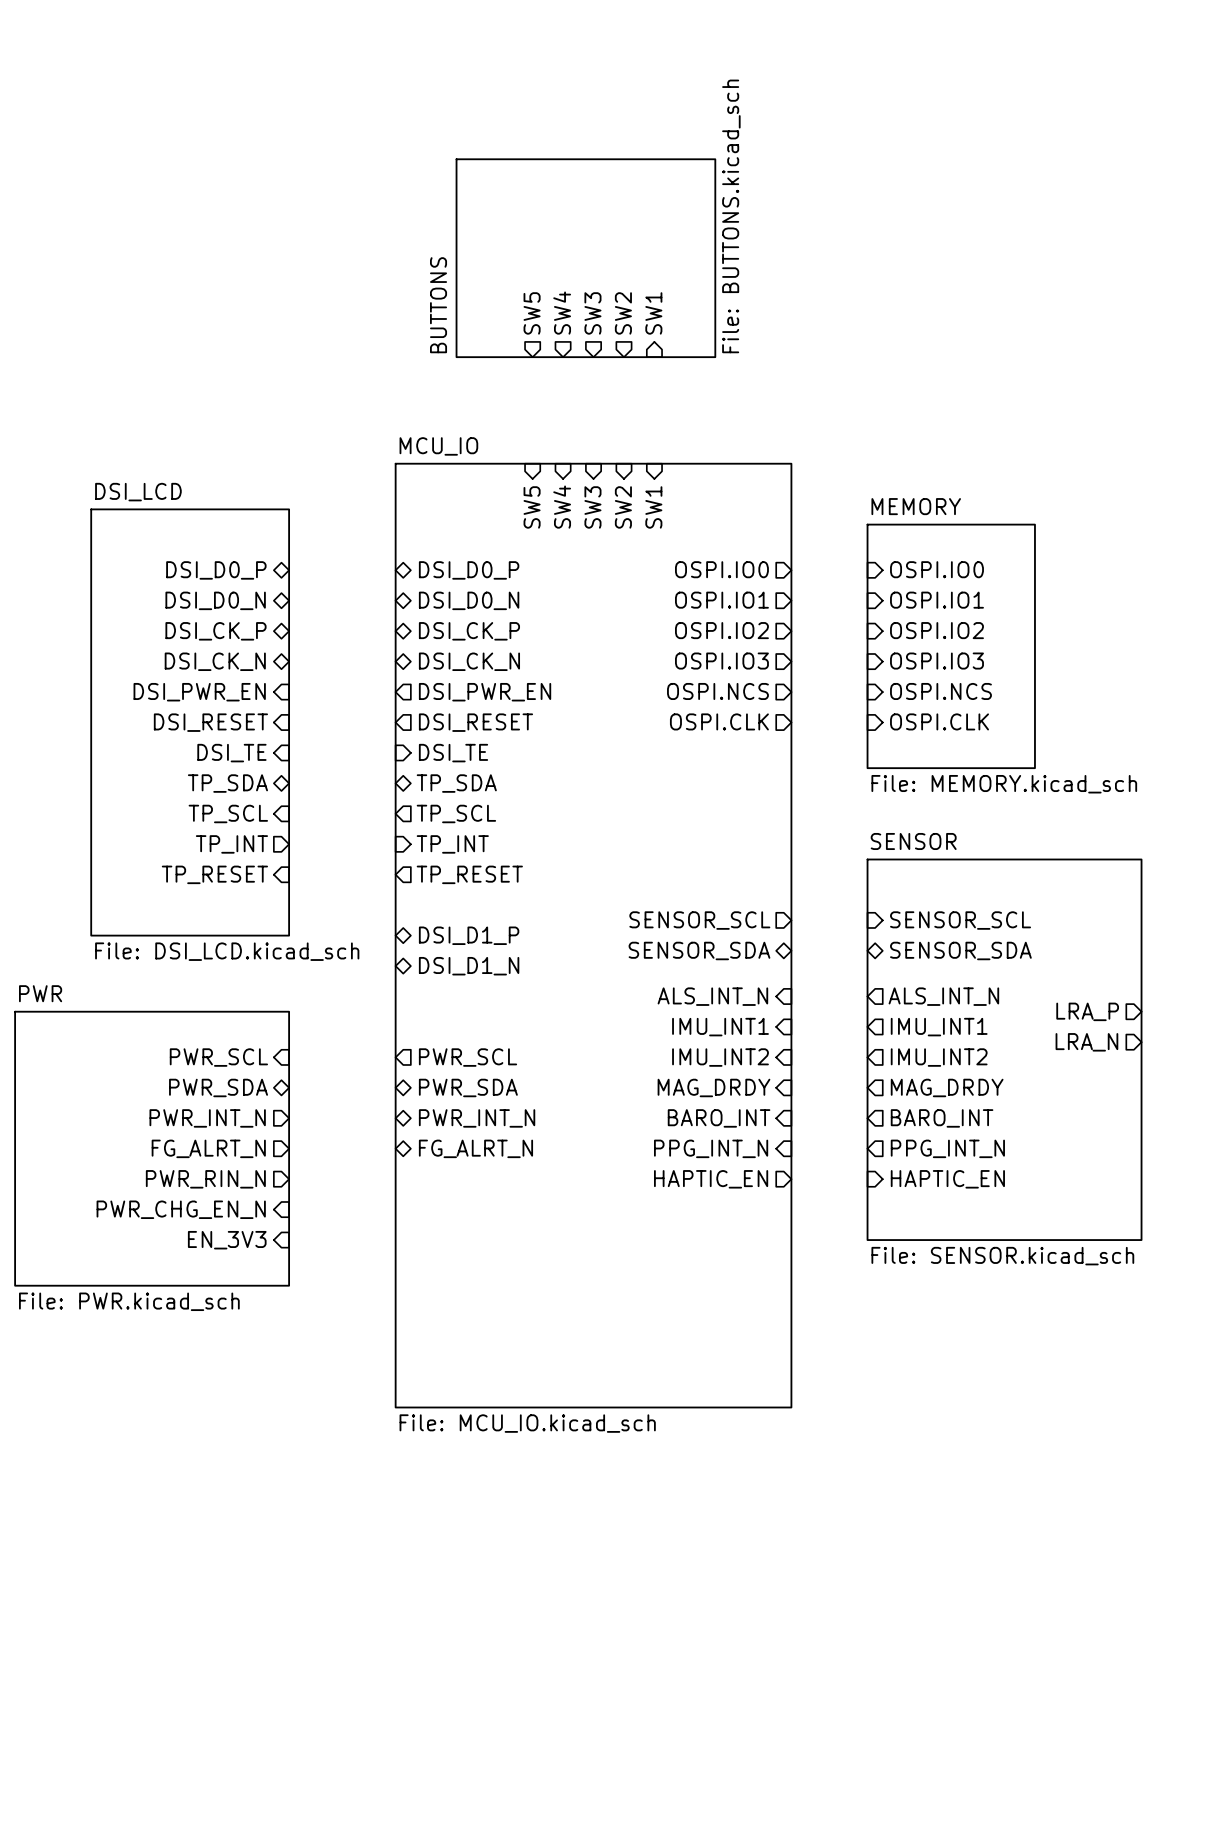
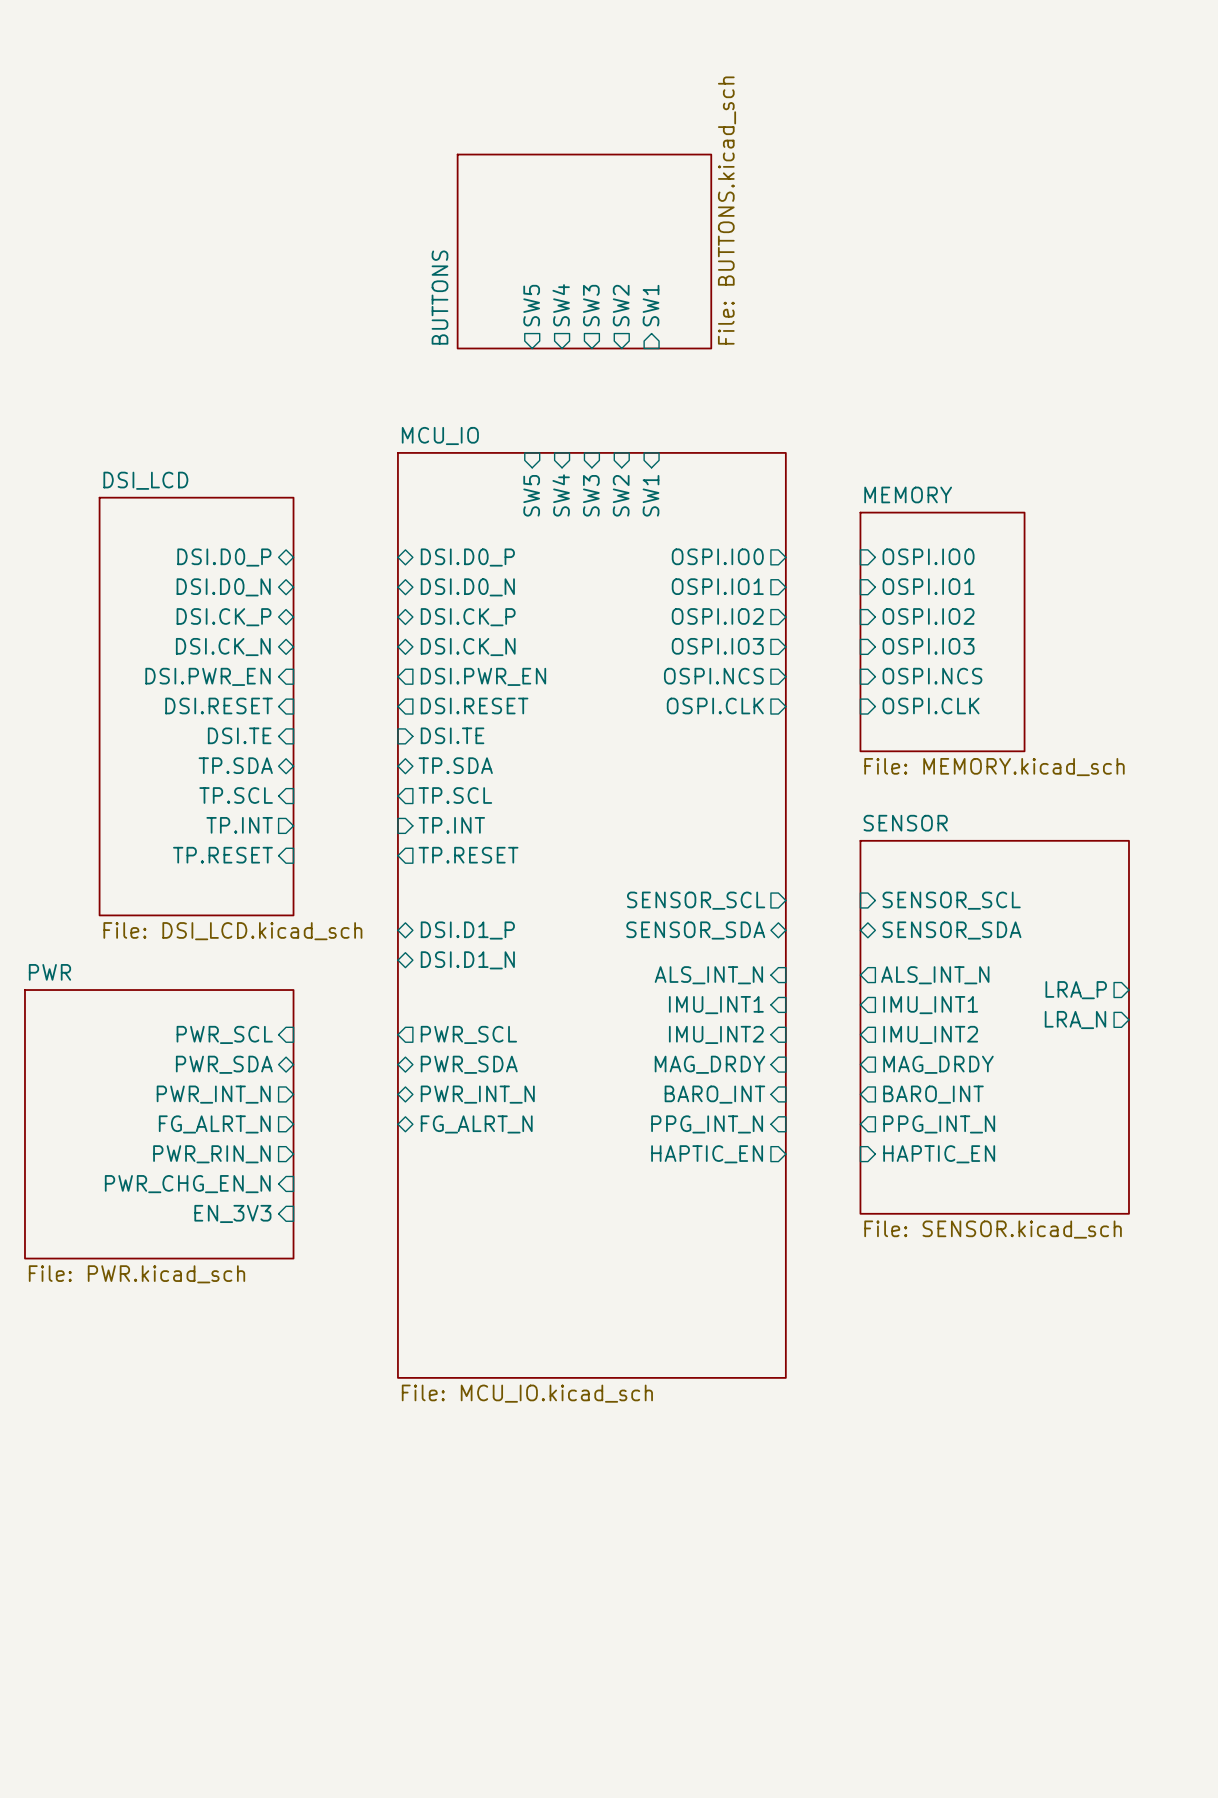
sheet pin: DSI_D0_P (216, 570) -> DSI.D0_P (224, 557)
sheet pin: DSI_D0_P (469, 570) -> DSI.D0_P (467, 557)
sheet pin: DSI_D0_N (215, 600) -> DSI.D0_N (223, 587)
sheet pin: DSI_D0_N (469, 600) -> DSI.D0_N (467, 587)
sheet pin: DSI_CK_P (216, 631) -> DSI.CK_P (224, 617)
sheet pin: DSI_CK_P (469, 631) -> DSI.CK_P (468, 617)
sheet pin: DSI_CK_N (215, 661) -> DSI.CK_N (223, 647)
sheet pin: DSI_CK_N (469, 661) -> DSI.CK_N (468, 647)
sheet pin: DSI_PWR_EN (199, 692) -> DSI.PWR_EN (208, 676)
sheet pin: DSI_PWR_EN (485, 692) -> DSI.PWR_EN (483, 676)
sheet pin: DSI_RESET (210, 722) -> DSI.RESET (219, 705)
sheet pin: DSI_RESET (475, 722) -> DSI.RESET (474, 705)
sheet pin: DSI_TE (231, 753) -> DSI.TE (239, 735)
sheet pin: DSI_TE (453, 753) -> DSI.TE (452, 735)
sheet pin: TP_SDA (227, 783) -> TP.SDA (235, 765)
sheet pin: TP_SDA (456, 783) -> TP.SDA (455, 765)
sheet pin: TP_SCL (228, 813) -> TP.SCL (236, 795)
sheet pin: TP_SCL (456, 813) -> TP.SCL (455, 795)
sheet pin: TP_INT (231, 844) -> TP.INT (239, 825)
sheet pin: TP_INT (452, 844) -> TP.INT (451, 825)
sheet pin: TP_RESET (214, 874) -> TP.RESET (222, 855)
sheet pin: TP_RESET (469, 874) -> TP.RESET (468, 855)
sheet pin: DSI_D1_P (469, 935) -> none
sheet pin: none -> DSI.D1_P (467, 930)
sheet pin: DSI_D1_N (469, 966) -> none
sheet pin: none -> DSI.D1_N (467, 960)

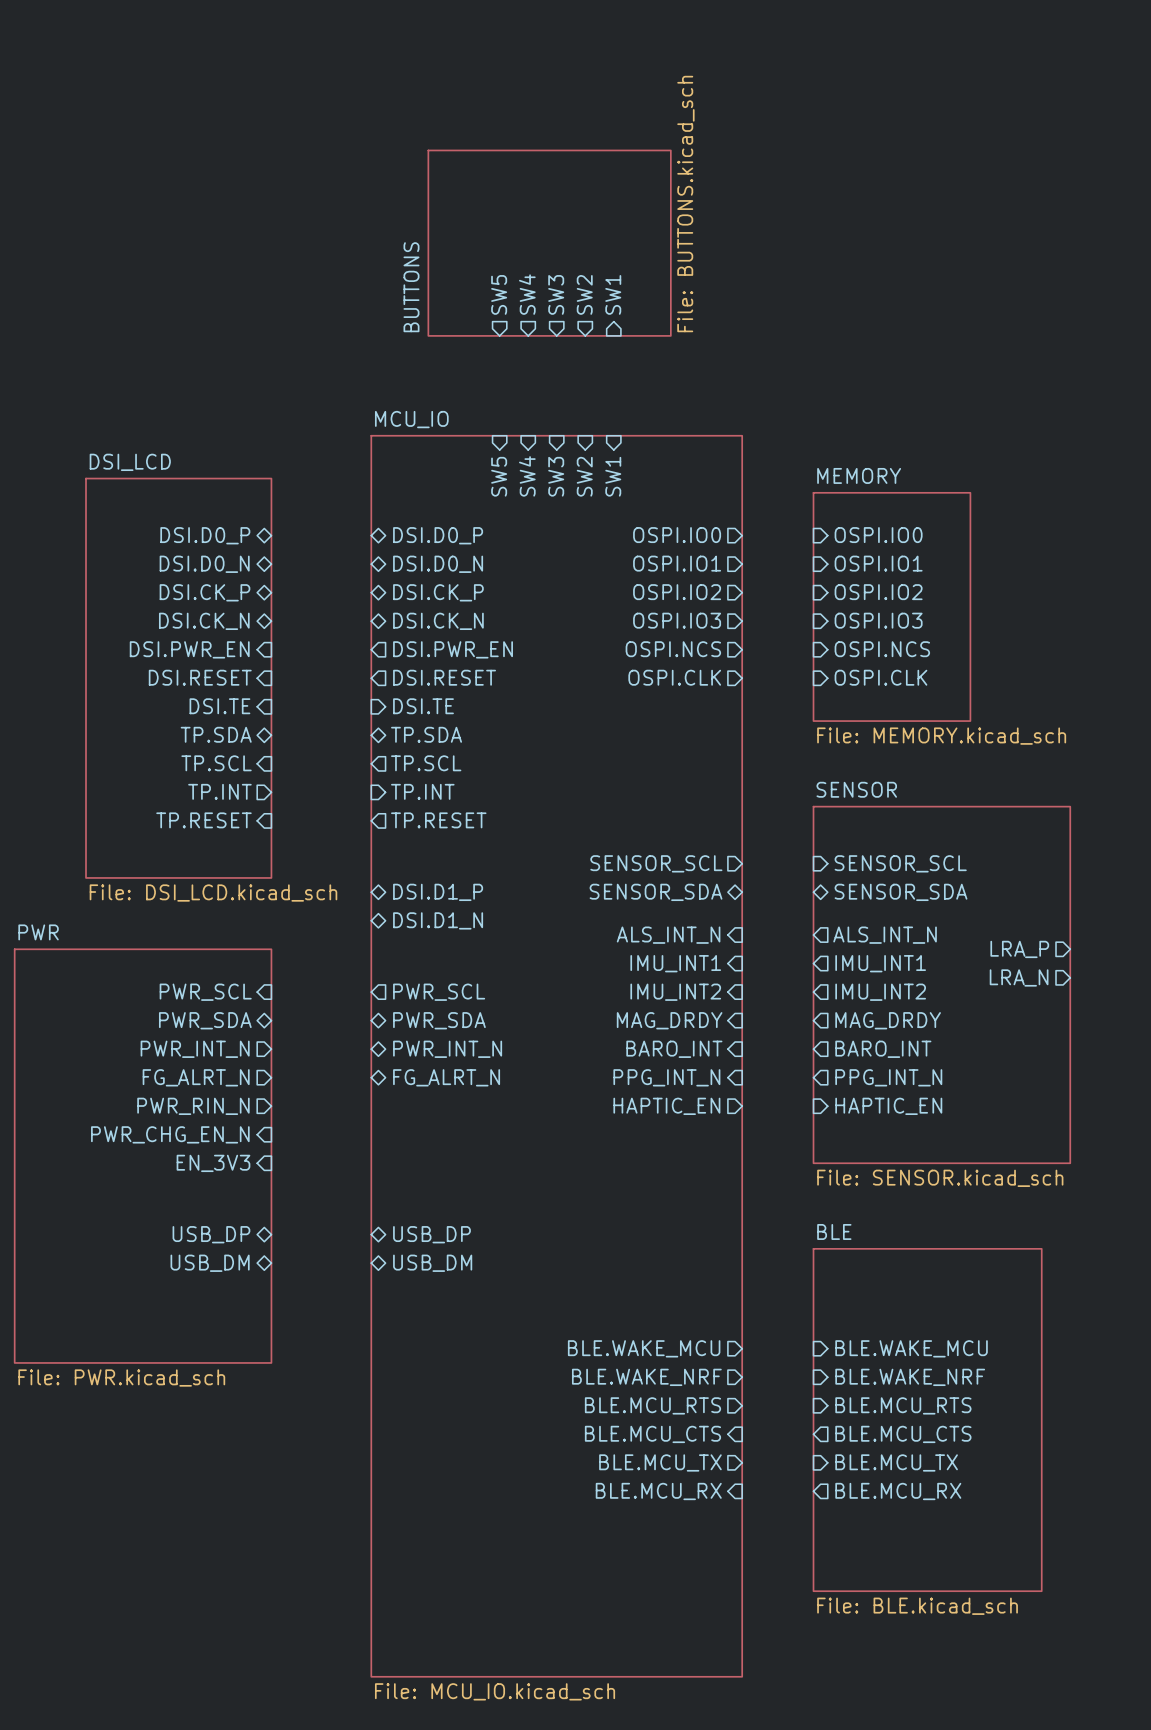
sheet MCU_IO: File: MCU_IO.kicad_sch (591, 915) -> none
sheet MCU_IO: none -> File: MCU_IO.kicad_sch (556, 1056)
sheet PWR: File: PWR.kicad_sch (159, 1124) -> none
sheet PWR: none -> File: PWR.kicad_sch (143, 1156)
sheet pin: none -> USB_DP (211, 1234)
sheet pin: none -> USB_DP (431, 1234)
sheet pin: none -> USB_DM (210, 1263)
sheet pin: none -> USB_DM (432, 1263)
sheet pin: none -> BLE.WAKE_MCU (644, 1348)
sheet pin: none -> BLE.WAKE_MCU (911, 1348)
sheet pin: none -> BLE.WAKE_NRF (646, 1377)
sheet pin: none -> BLE.WAKE_NRF (910, 1377)
sheet pin: none -> BLE.MCU_RTS (652, 1405)
sheet pin: none -> BLE.MCU_RTS (903, 1405)
sheet BLE: none -> File: BLE.kicad_sch (927, 1420)
sheet pin: none -> BLE.MCU_CTS (652, 1434)
sheet pin: none -> BLE.MCU_CTS (903, 1434)
sheet pin: none -> BLE.MCU_TX (660, 1462)
sheet pin: none -> BLE.MCU_TX (896, 1462)
sheet pin: none -> BLE.MCU_RX (658, 1491)
sheet pin: none -> BLE.MCU_RX (898, 1491)

